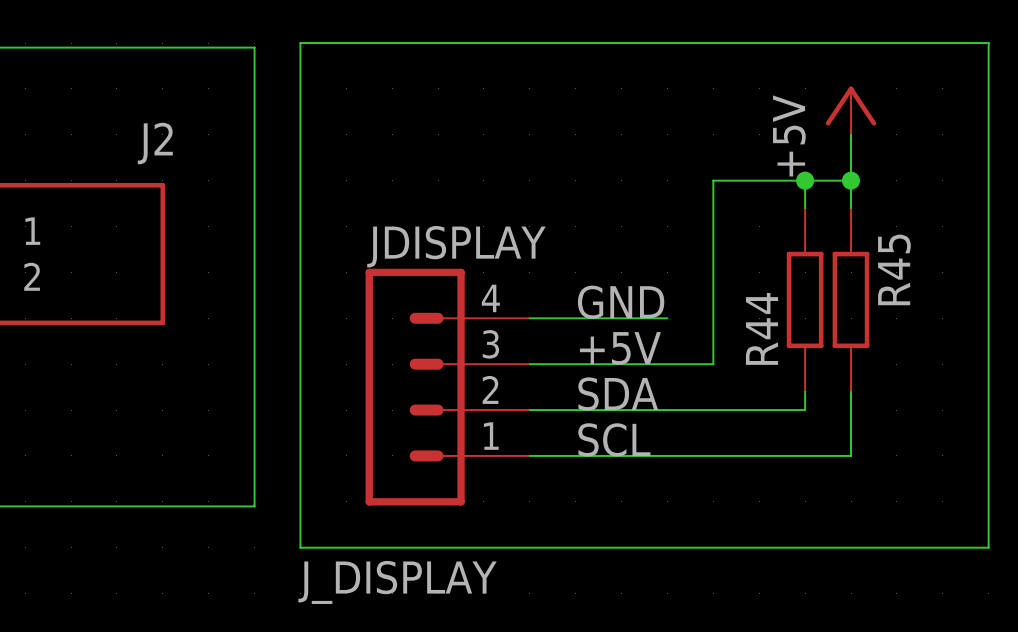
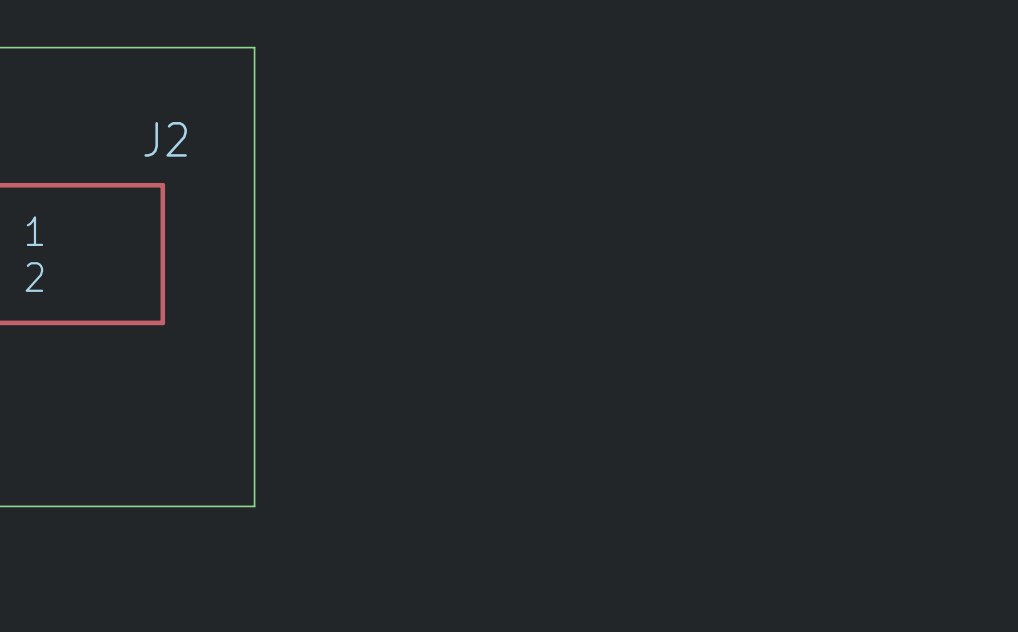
wire: (300, 43) (300, 547) (988, 547) (988, 43) (300, 43) -> none
power symbol: +5V (851, 110) -> none
wire: (851, 134) (851, 208) -> none
wire: (805, 180) (805, 208) -> none
junction: (805, 180) -> none
wire: (851, 180) (713, 180) (713, 364) (529, 364) -> none
junction: (851, 180) -> none
R44: (805, 299) -> none
R45: (851, 299) -> none
label: GND (621, 302) -> none
wire: (529, 318) (667, 318) -> none
label: +5V (620, 348) -> none
JDISPLAY: (447, 387) -> none
wire: (805, 391) (805, 410) (529, 410) -> none
wire: (851, 391) (851, 455) (529, 455) -> none
label: SDA (618, 394) -> none
label: SCL (614, 439) -> none
label: J_DISPLAY (397, 582) -> none

